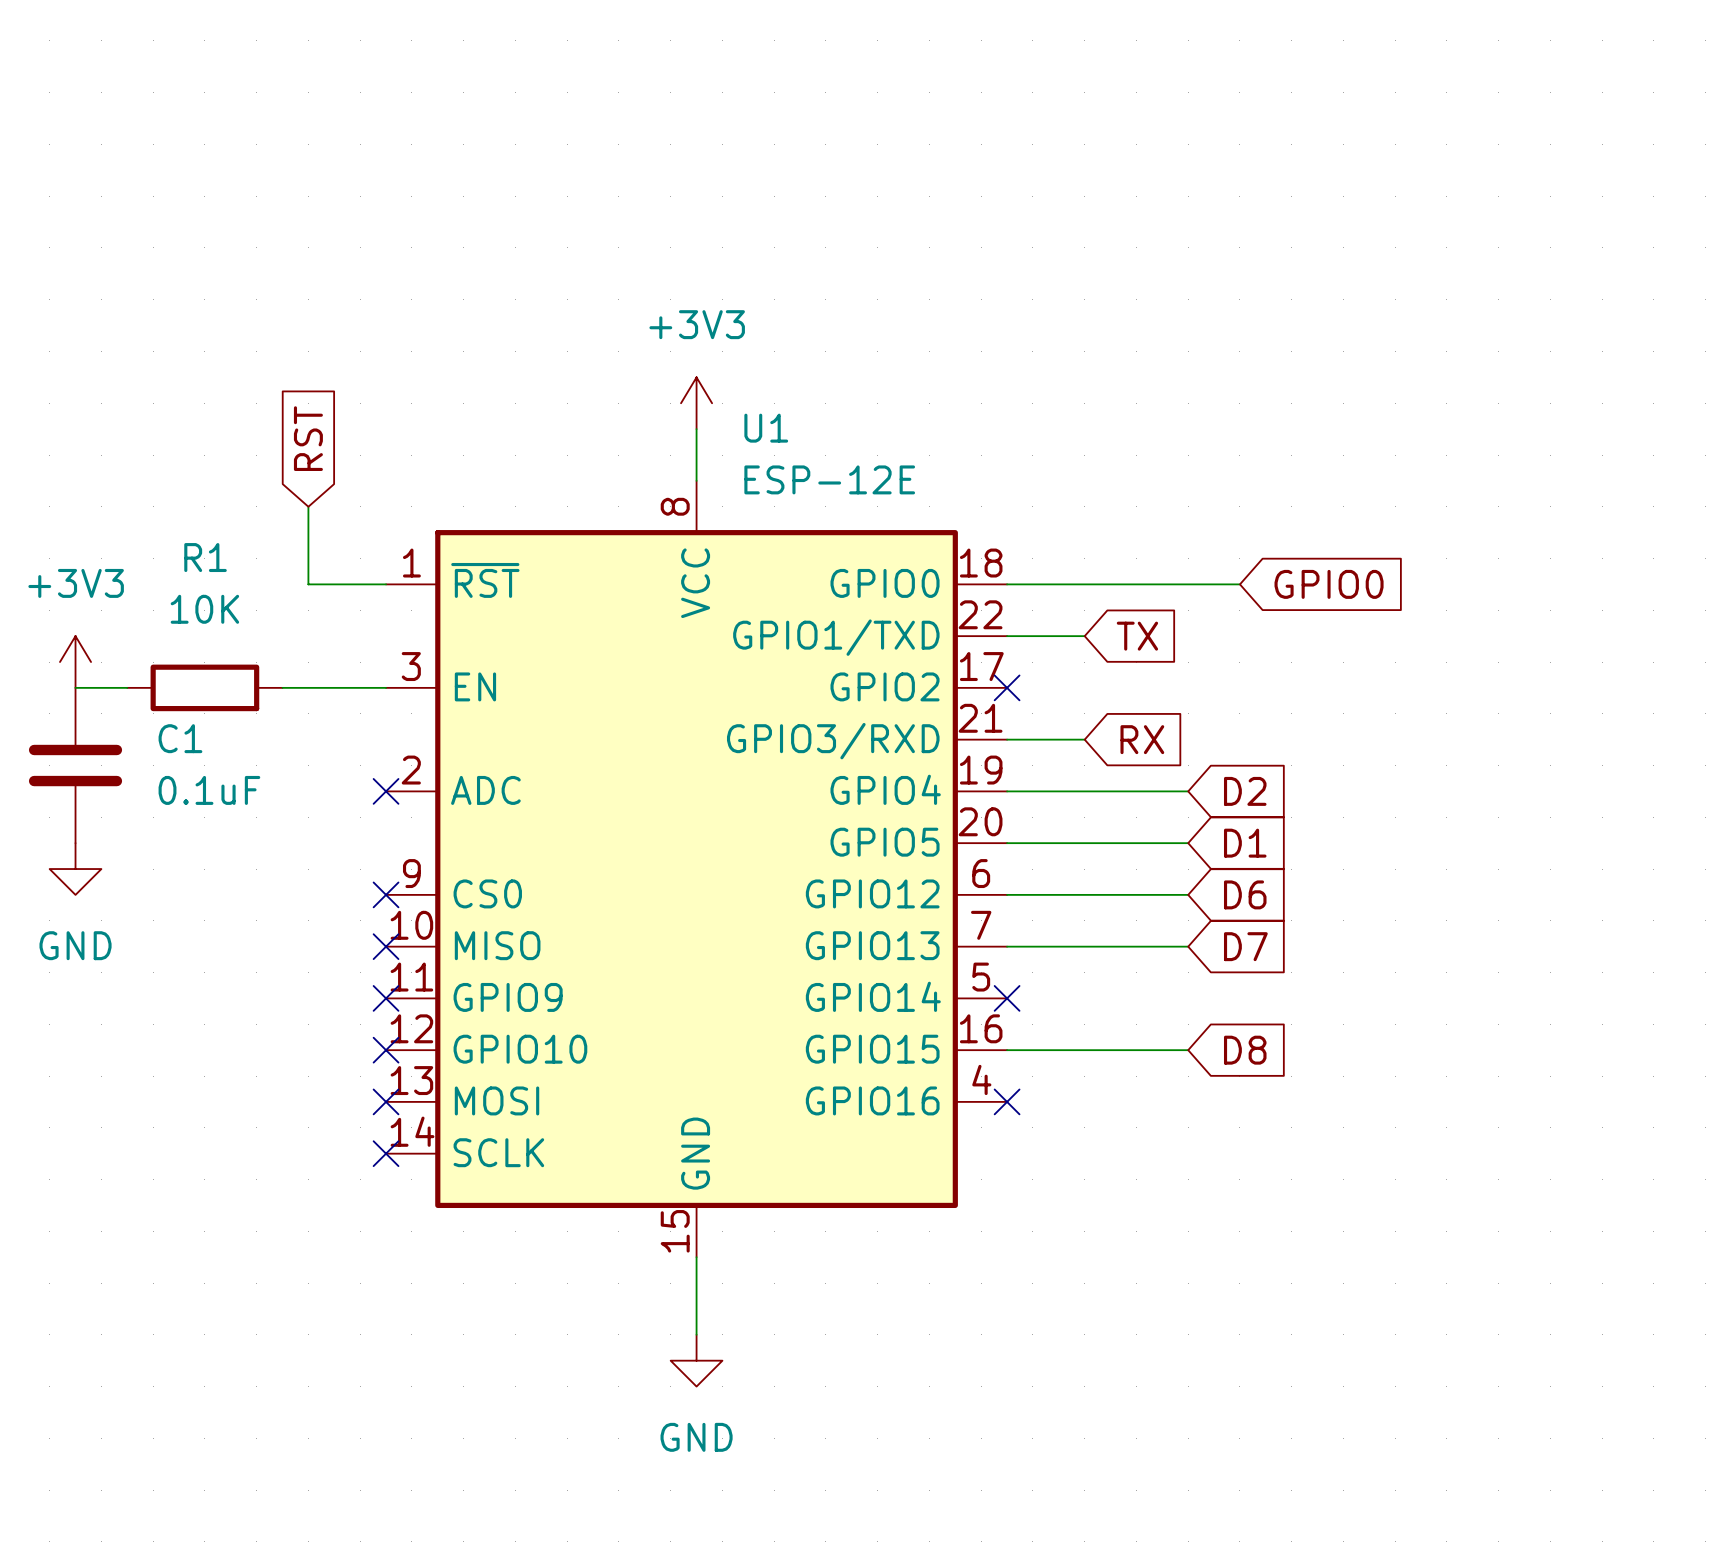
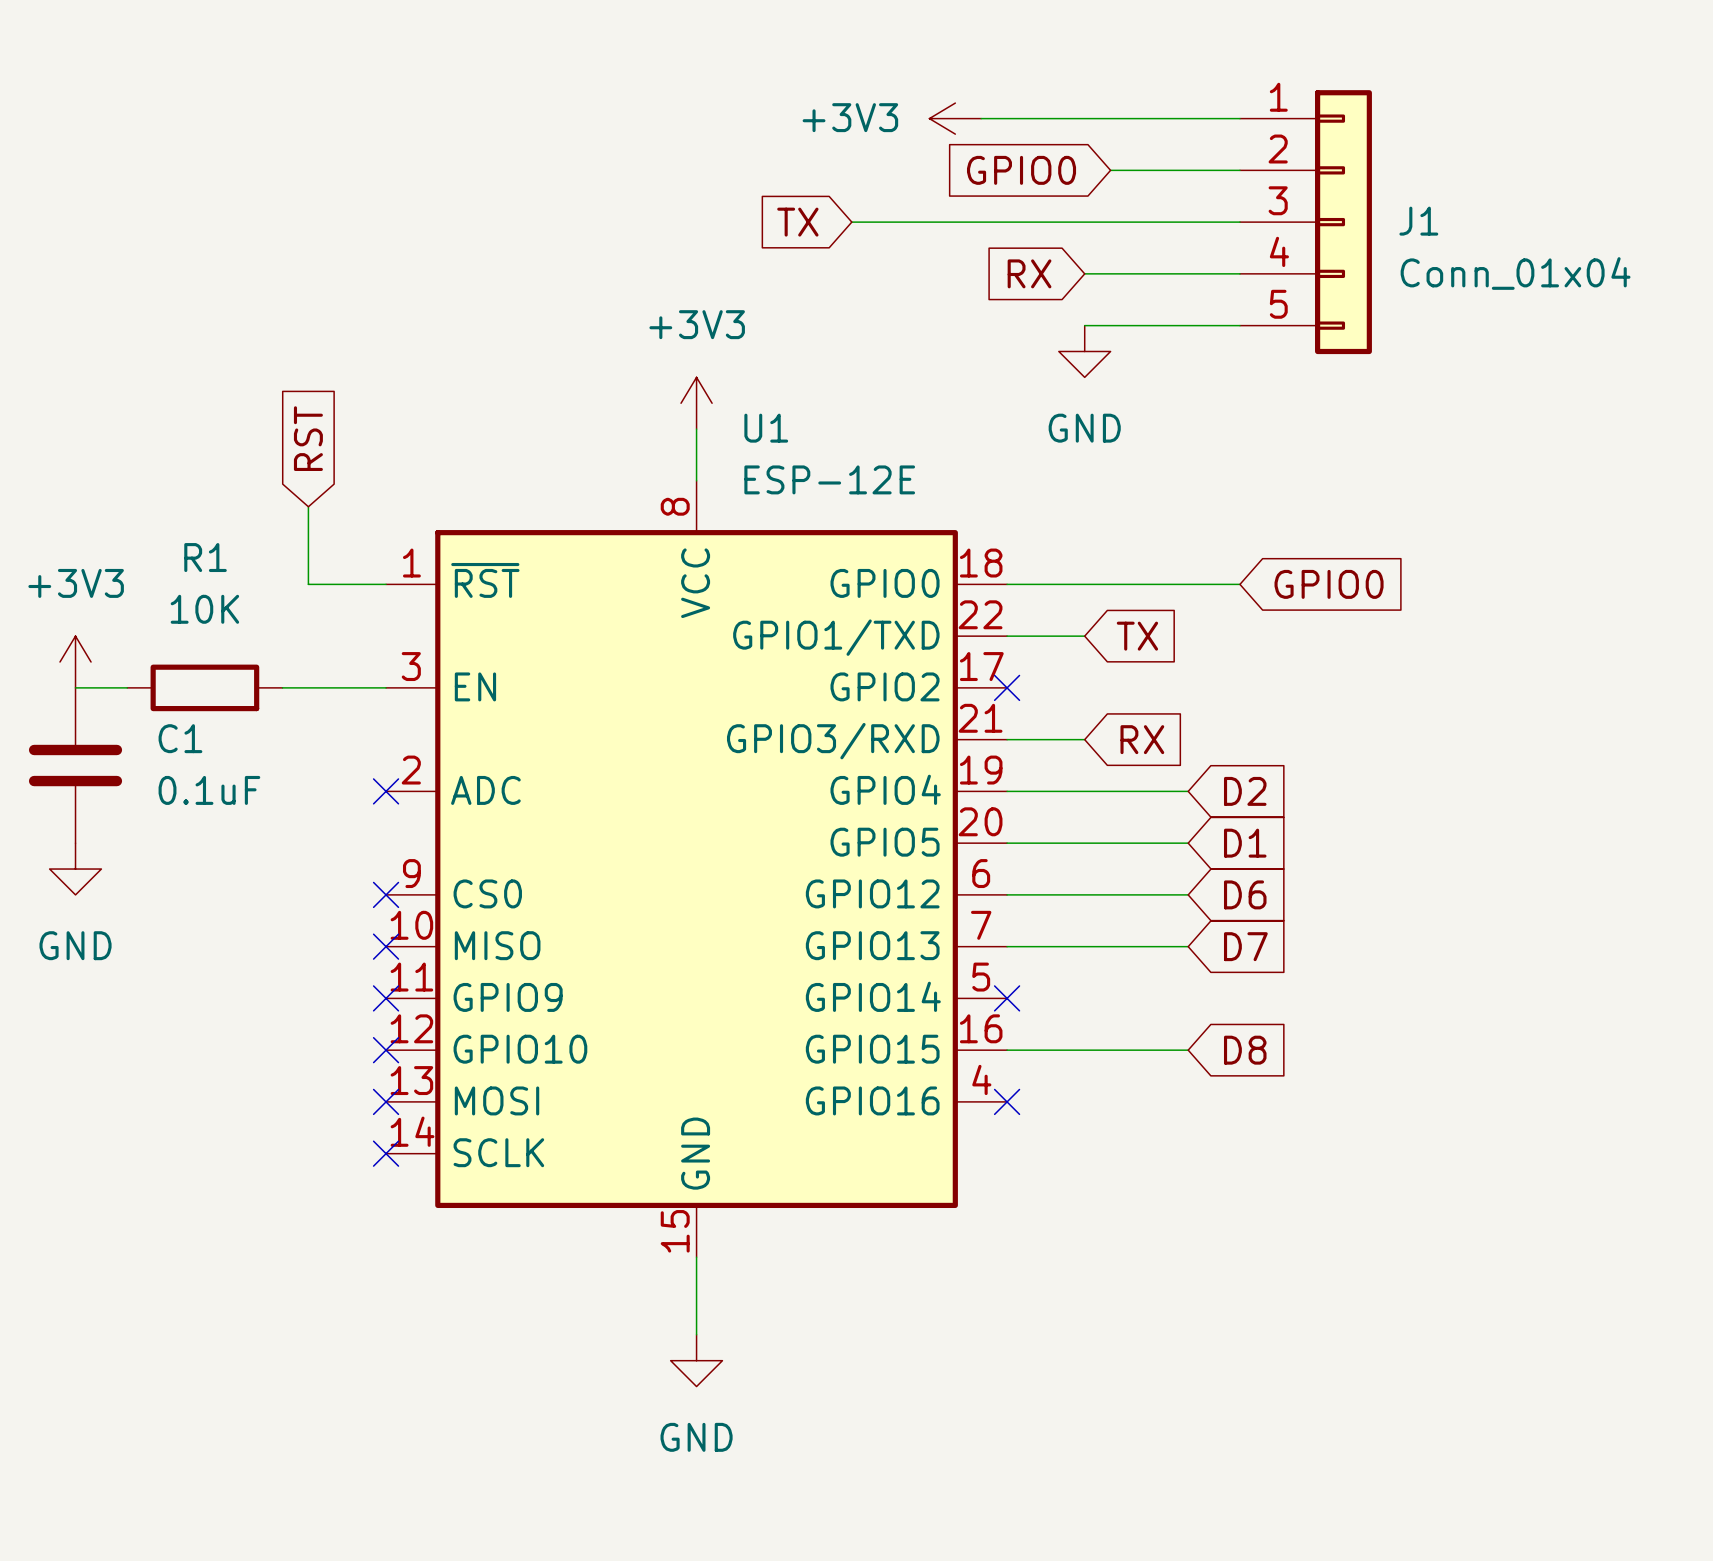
power symbol: none -> +3V3 (955, 118)
wire: none -> (981, 118) (1239, 118)
global label: none -> GPIO0 (1021, 170)
wire: none -> (1110, 170) (1239, 170)
global label: none -> TX (797, 222)
wire: none -> (851, 222) (1239, 222)
J1: none -> Conn_01x04 (1305, 222)
global label: none -> RX (1029, 273)
wire: none -> (1084, 273) (1239, 273)
wire: none -> (1084, 325) (1239, 325)
power symbol: none -> GND (1084, 351)

